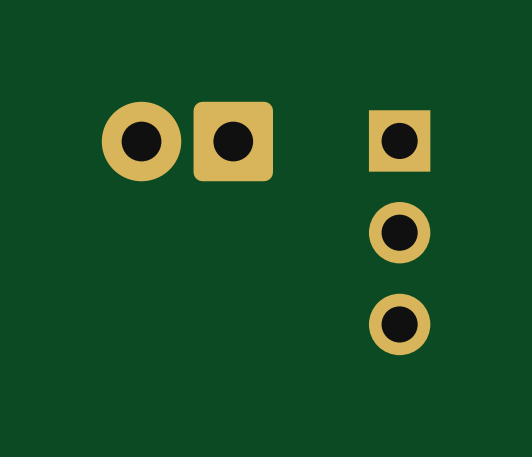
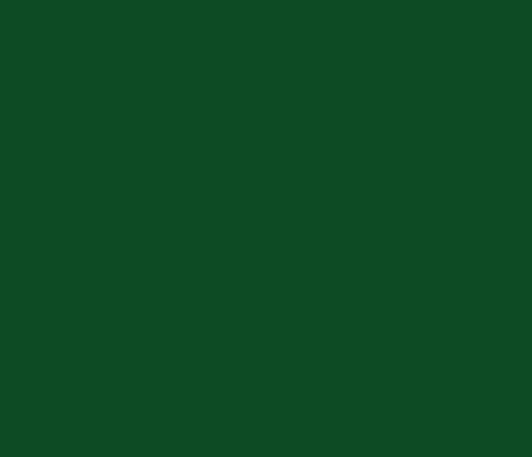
part: (187, 141) -> none
part: (399, 232) -> none

